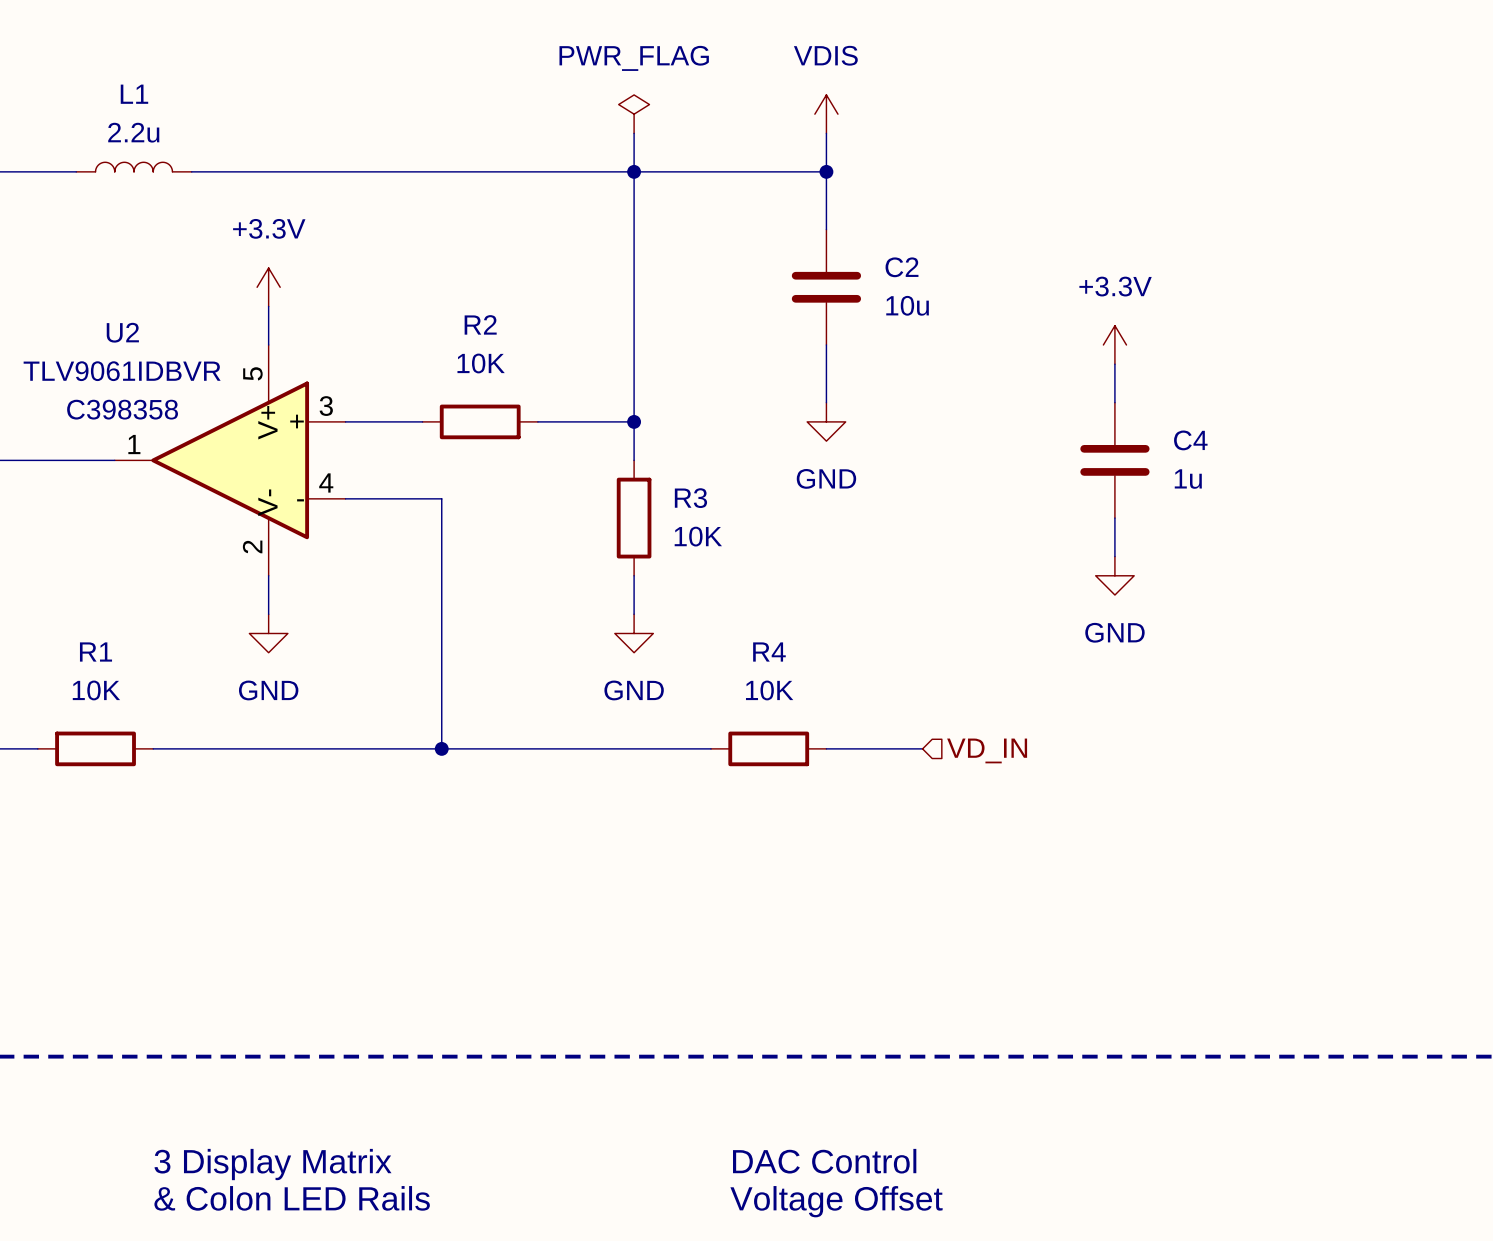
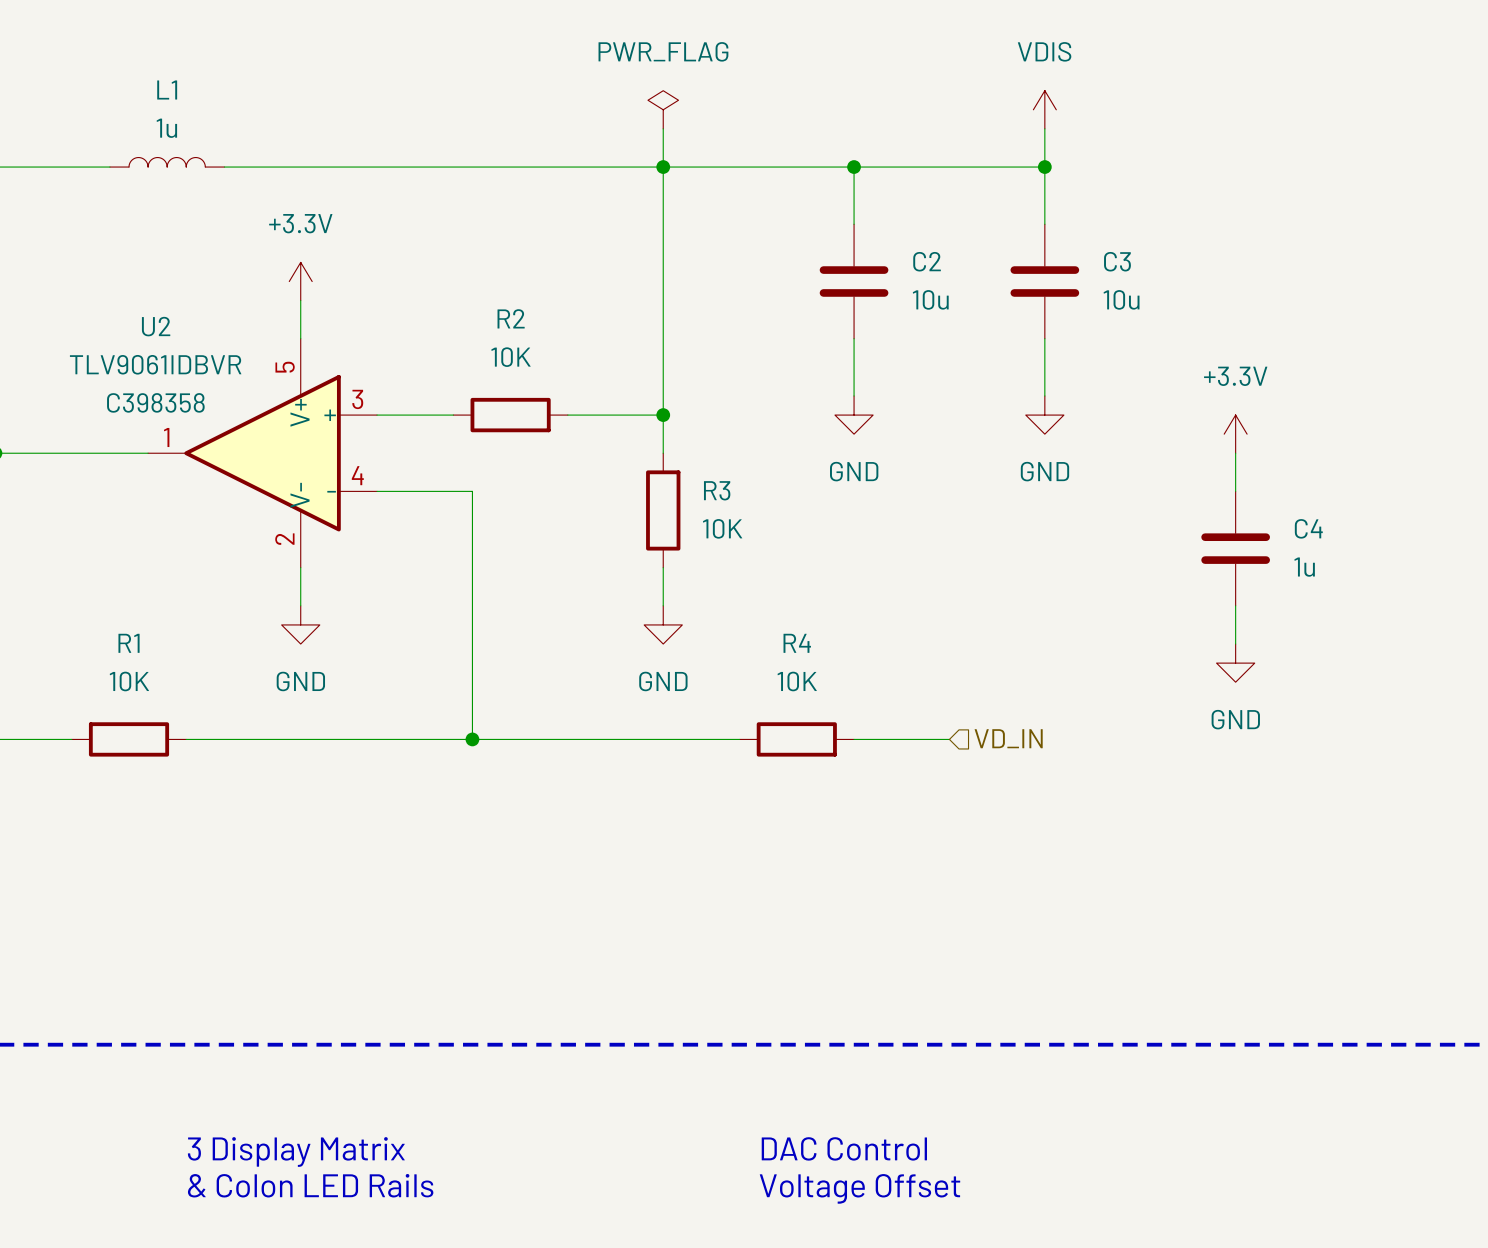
power symbol position: VDIS (826, 114) -> VDIS (1044, 109)
L1 value: 2.2u (133, 132) -> 1u (166, 128)
wire: (826, 133) (826, 171) -> (1044, 167) (854, 167)
wire: none -> (1044, 128) (1044, 224)
junction: none -> (1044, 167)
C3: none -> 10u (1044, 281)
wire: none -> (1044, 338) (1044, 395)
power symbol position: +3.3V (1114, 344) -> +3.3V (1235, 434)
wire: (1114, 364) (1114, 402) -> (1235, 453) (1235, 491)
power symbol: none -> GND (1044, 415)
C4 position: (1114, 460) -> (1235, 548)
wire: (1114, 518) (1114, 556) -> (1235, 605) (1235, 644)
power symbol: GND (1114, 575) -> none
power symbol: none -> GND (1235, 663)

